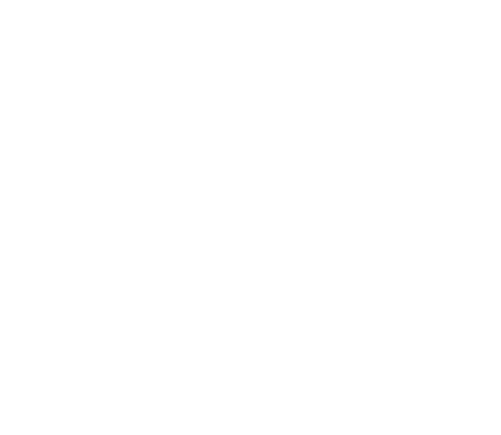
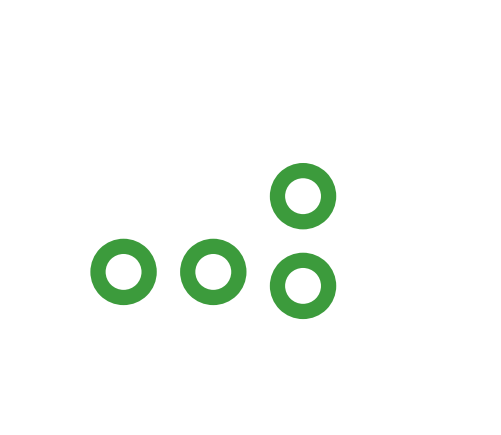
part: none -> (303, 241)
part: none -> (168, 271)

